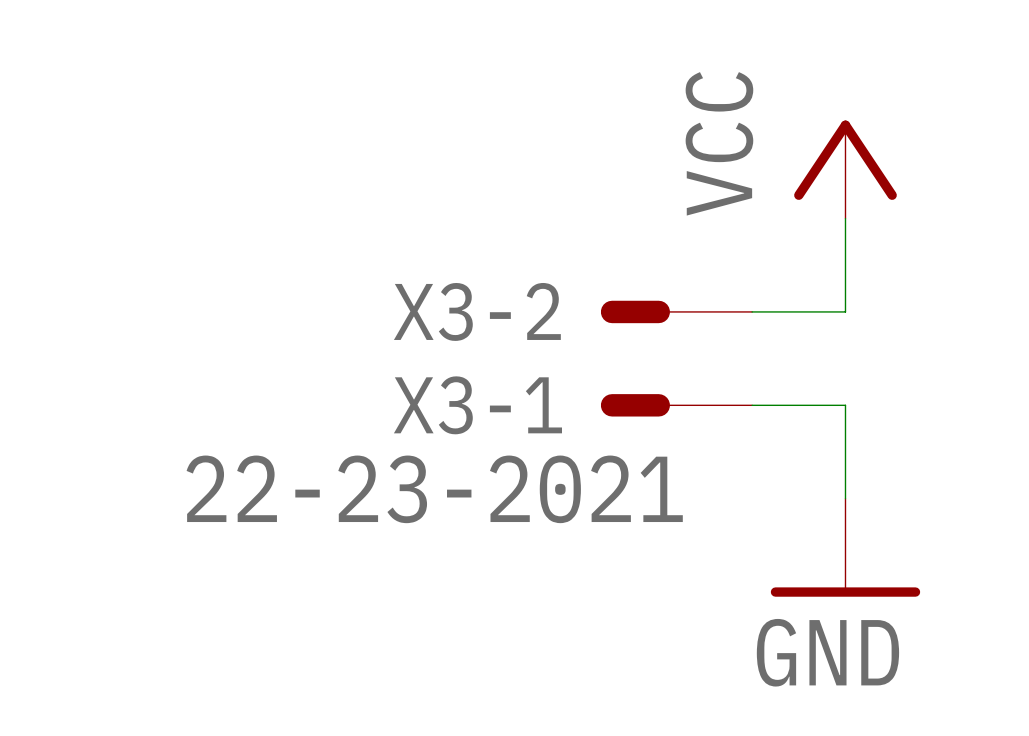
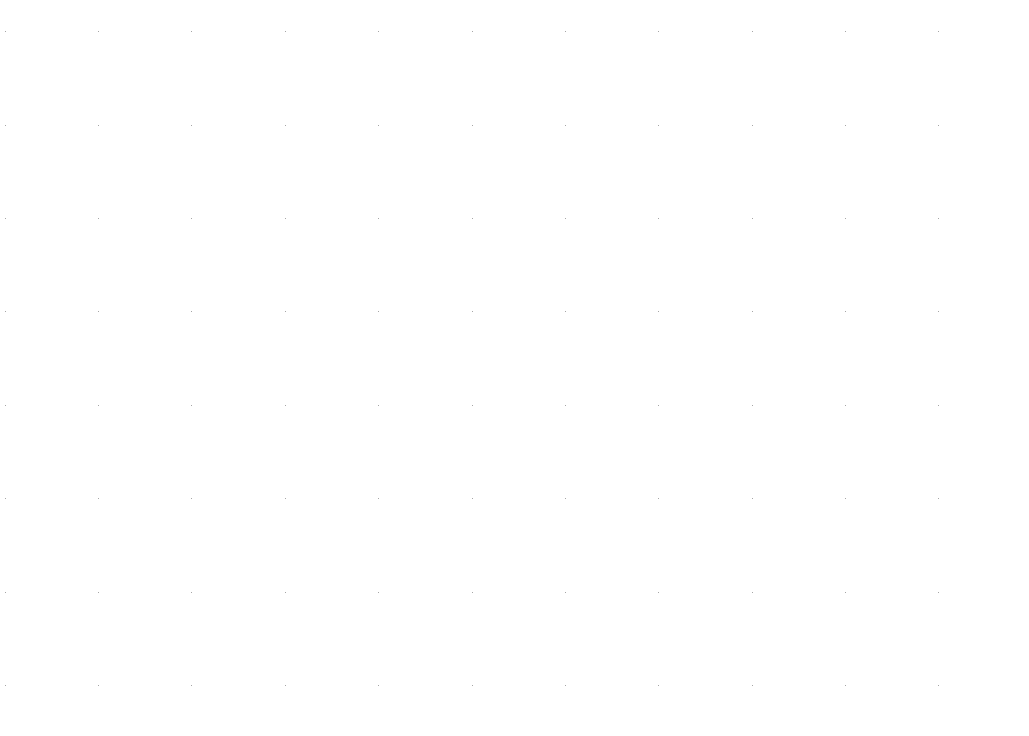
power symbol: VCC (845, 169) -> none
wire: (845, 218) (845, 311) (752, 311) -> none
X3-2: (676, 311) -> none
X3-1: 22-23-2021 (676, 405) -> none
wire: (752, 405) (845, 405) (845, 498) -> none
power symbol: GND (845, 547) -> none

